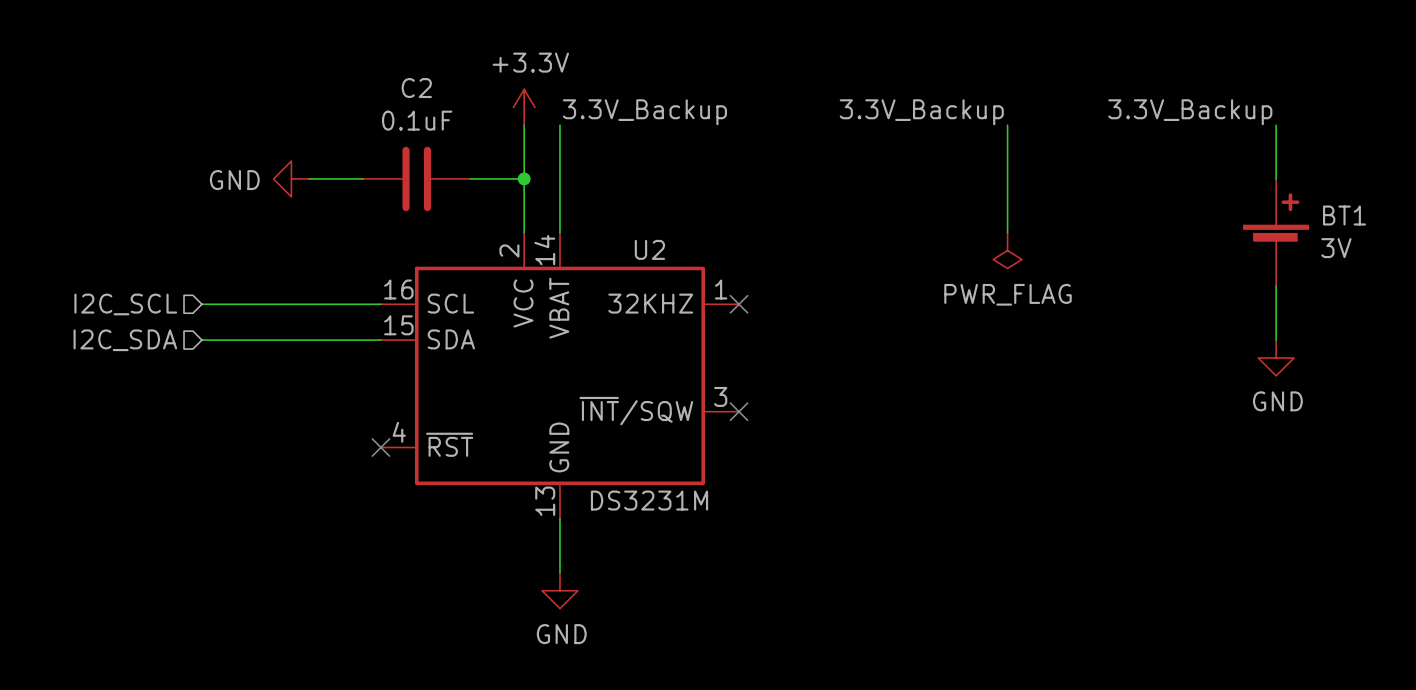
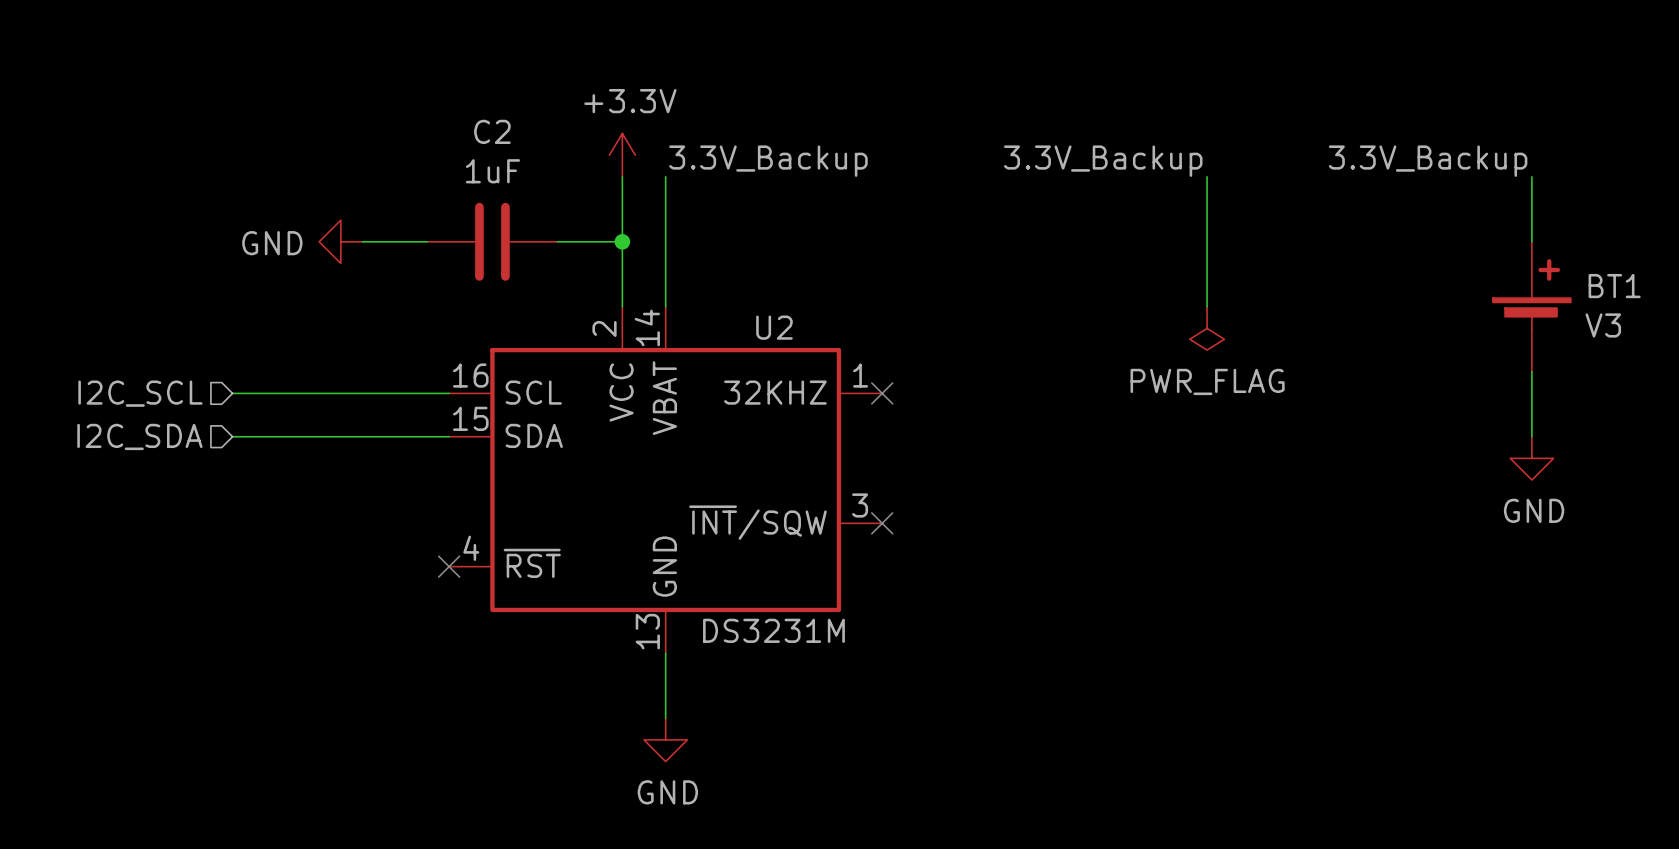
C2 value: 0.1uF (417, 120) -> 1uF (492, 171)
BT1 value: 3V (1336, 248) -> V3 (1603, 325)

